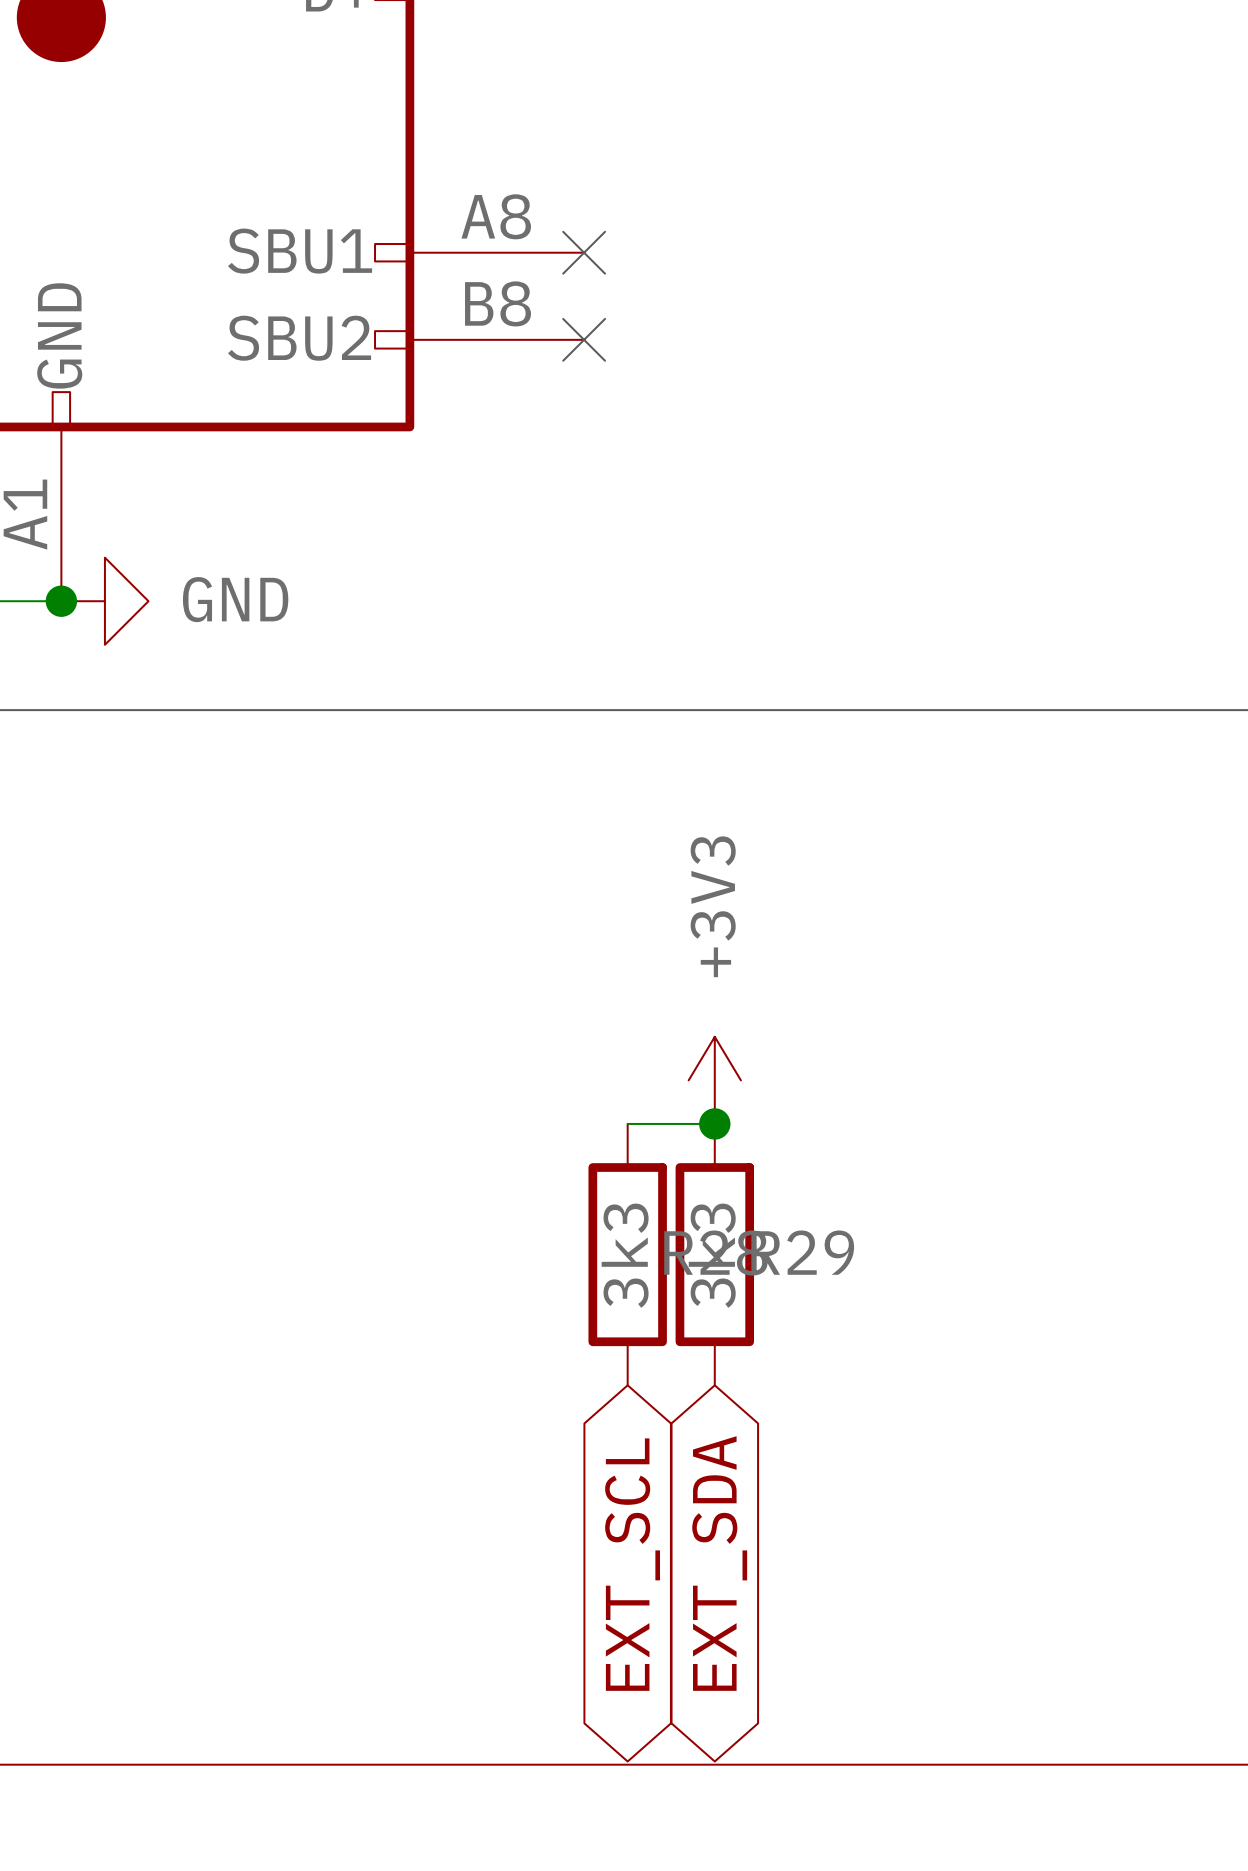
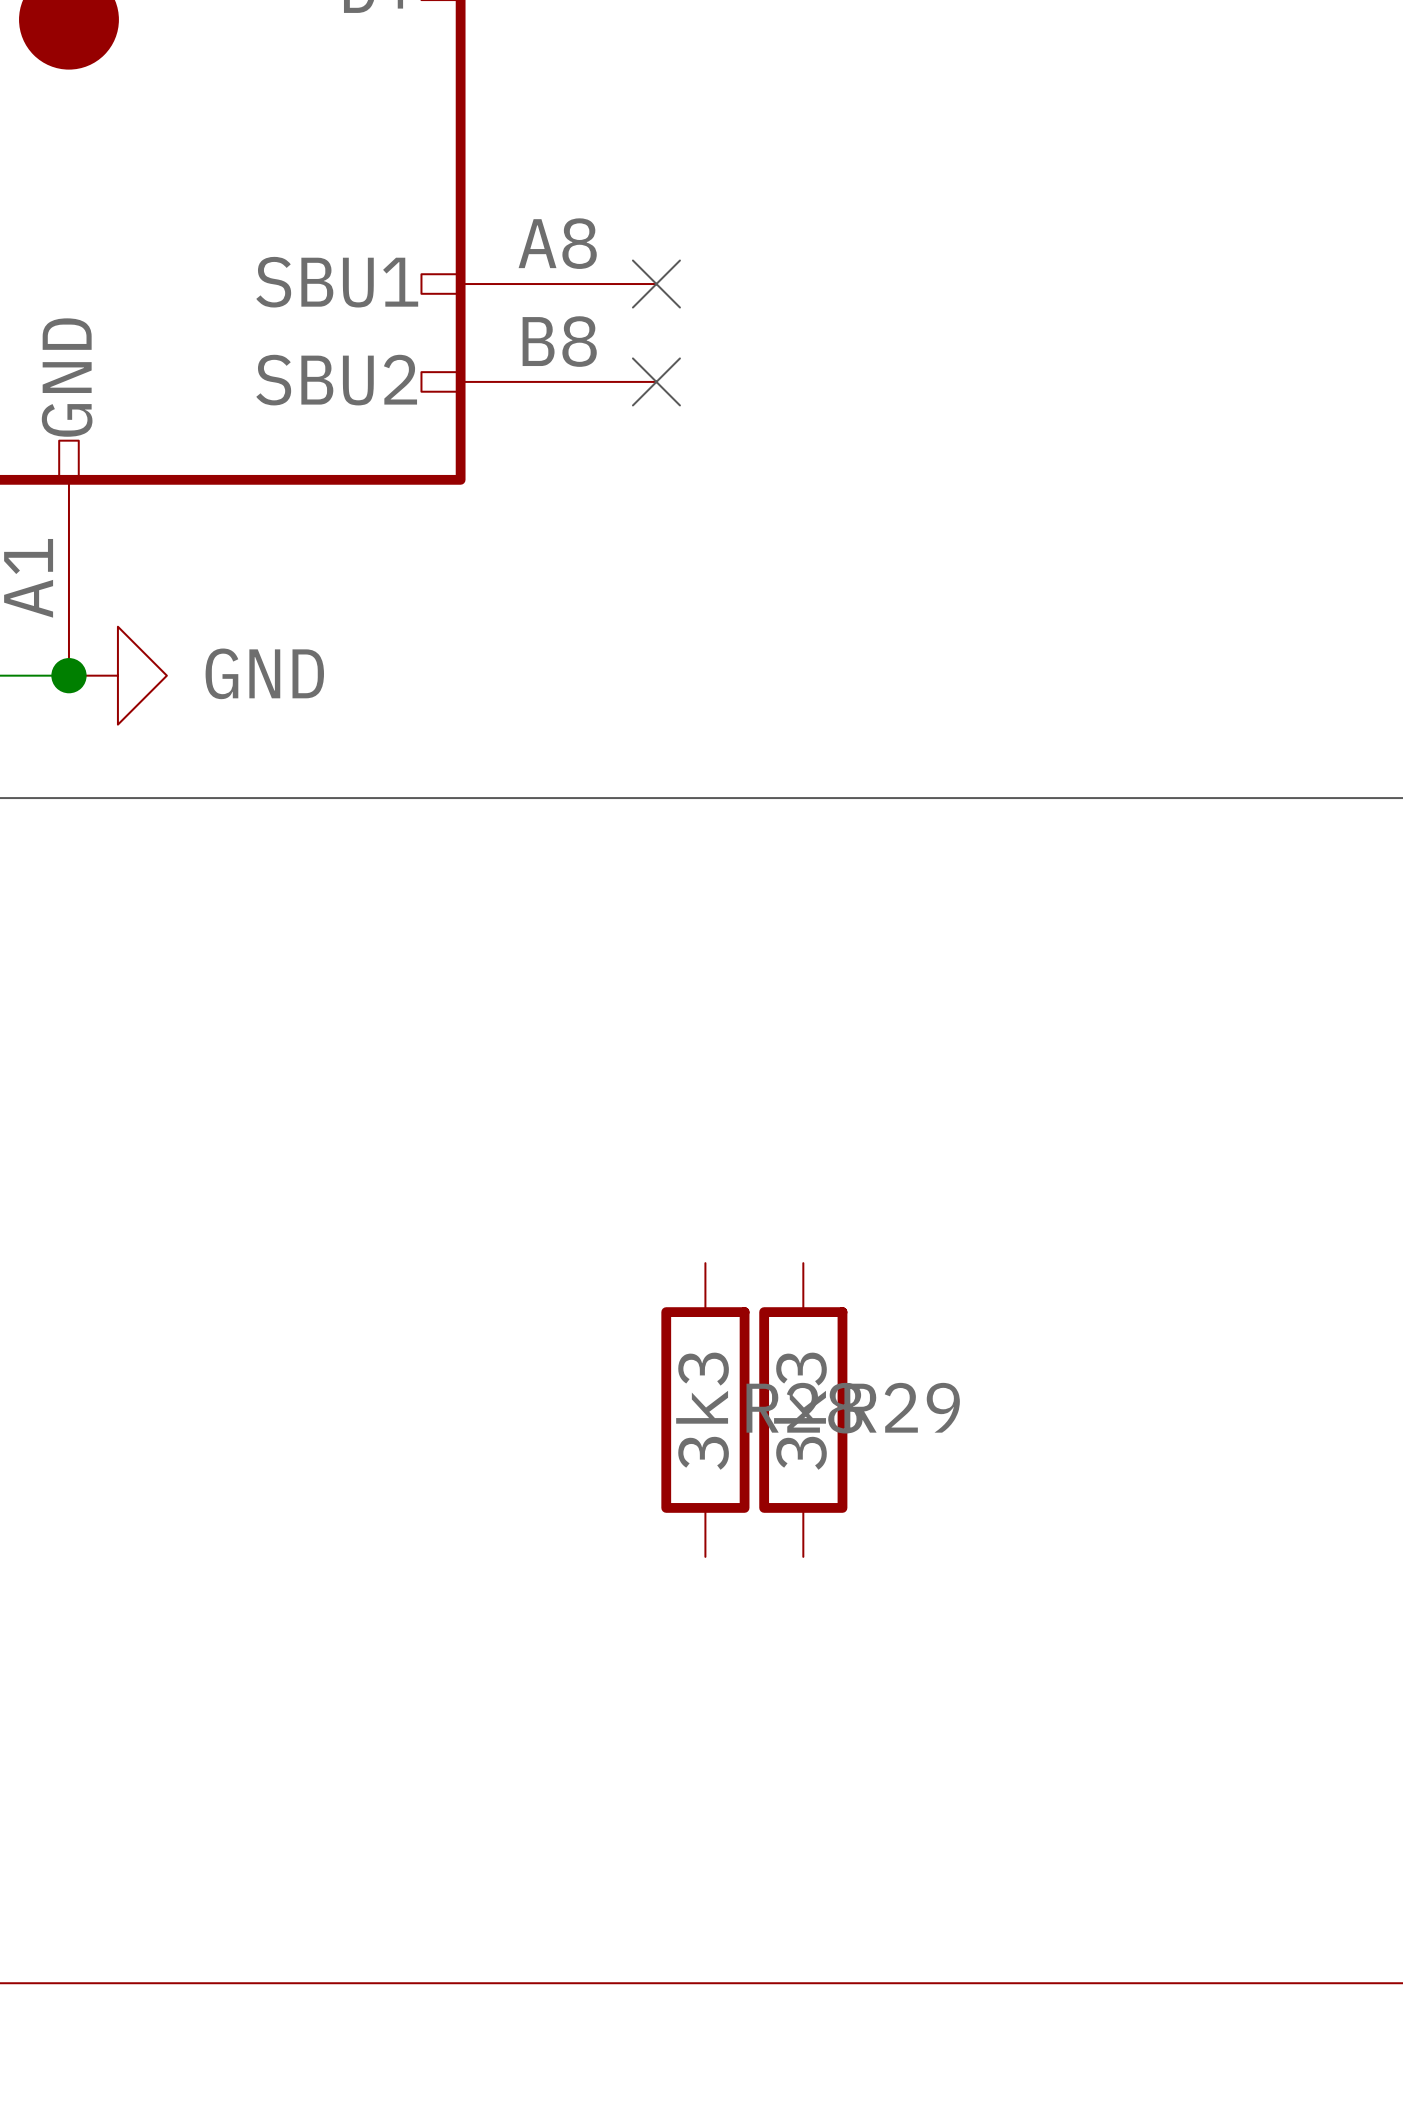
power symbol: +3V3 (714, 1080) -> none
wire: (627, 1123) (714, 1123) -> none
junction: (714, 1123) -> none
global label: EXT_SDA (719, 1563) -> none
global label: EXT_SCL (632, 1564) -> none

